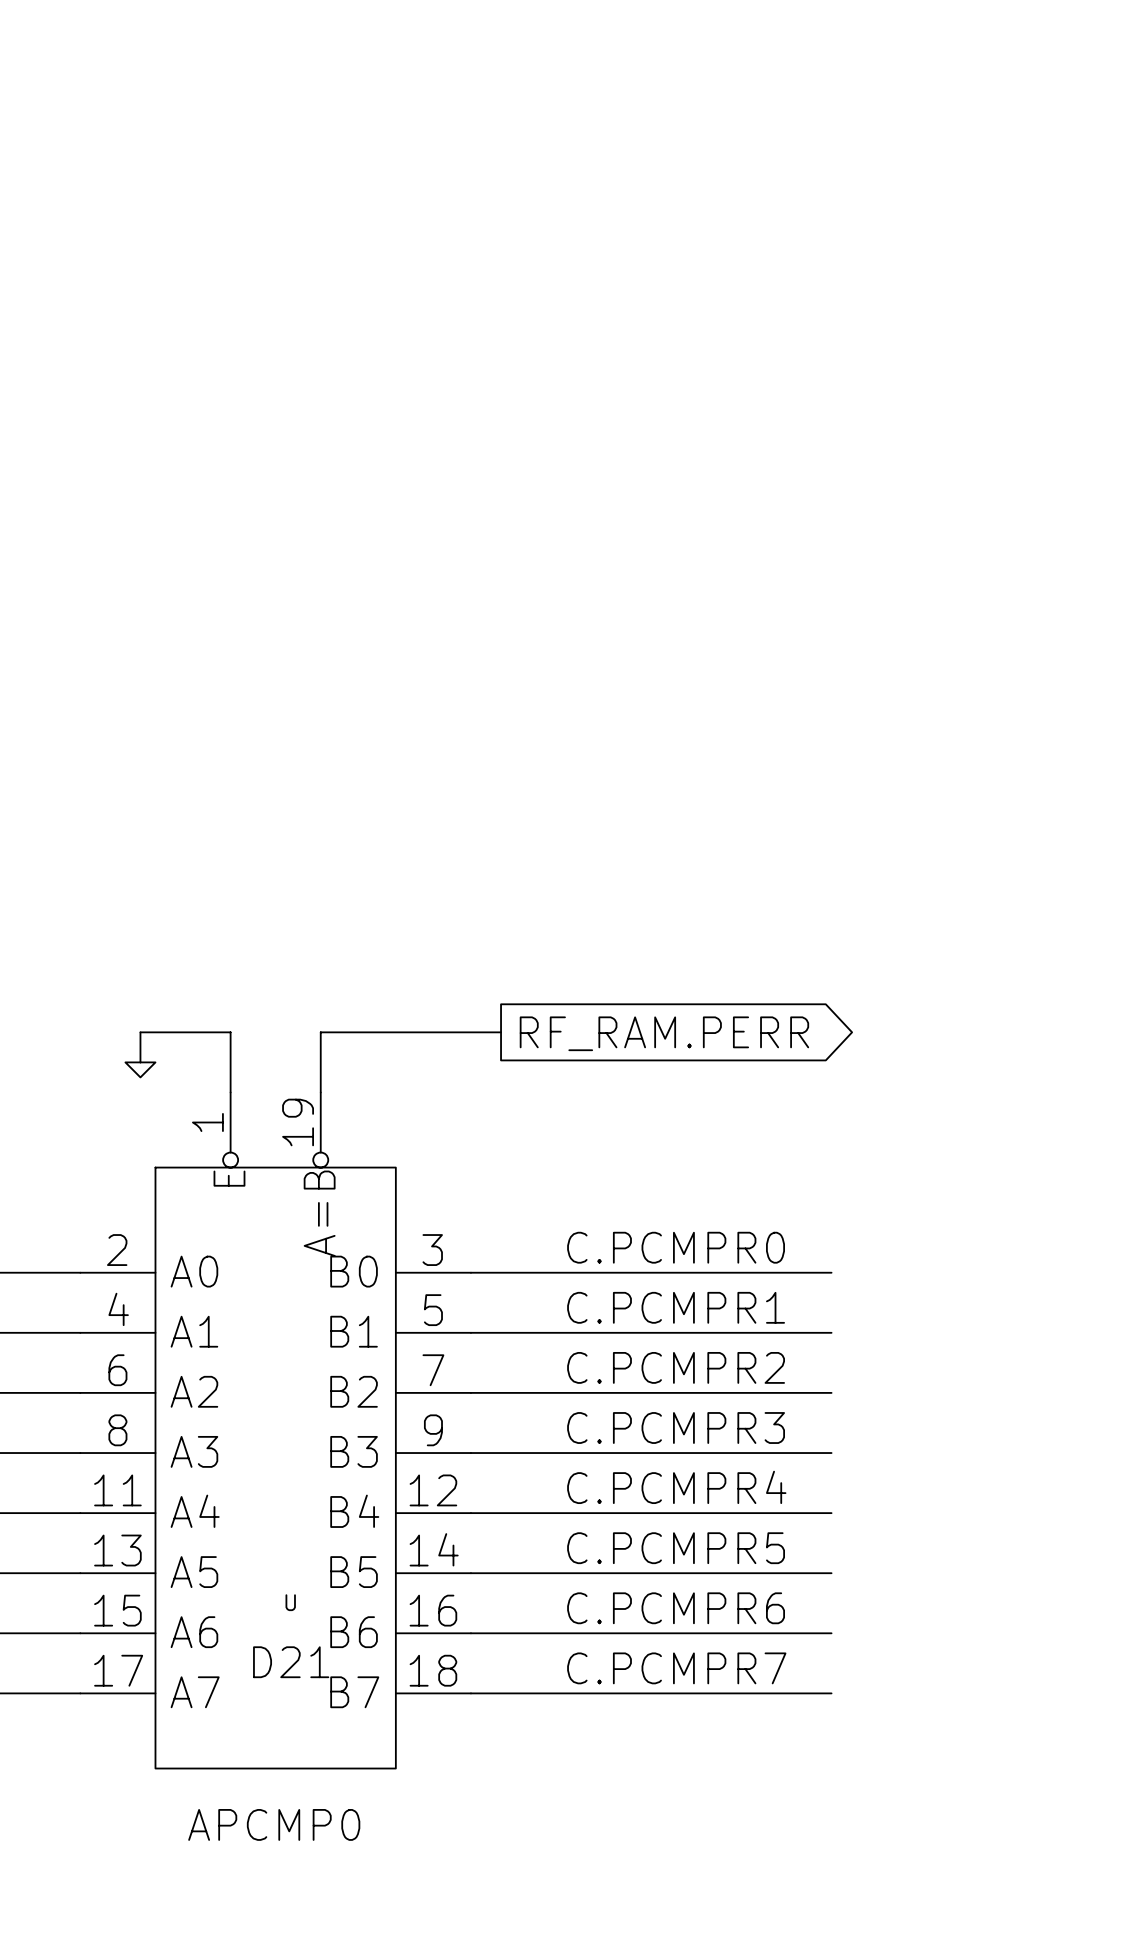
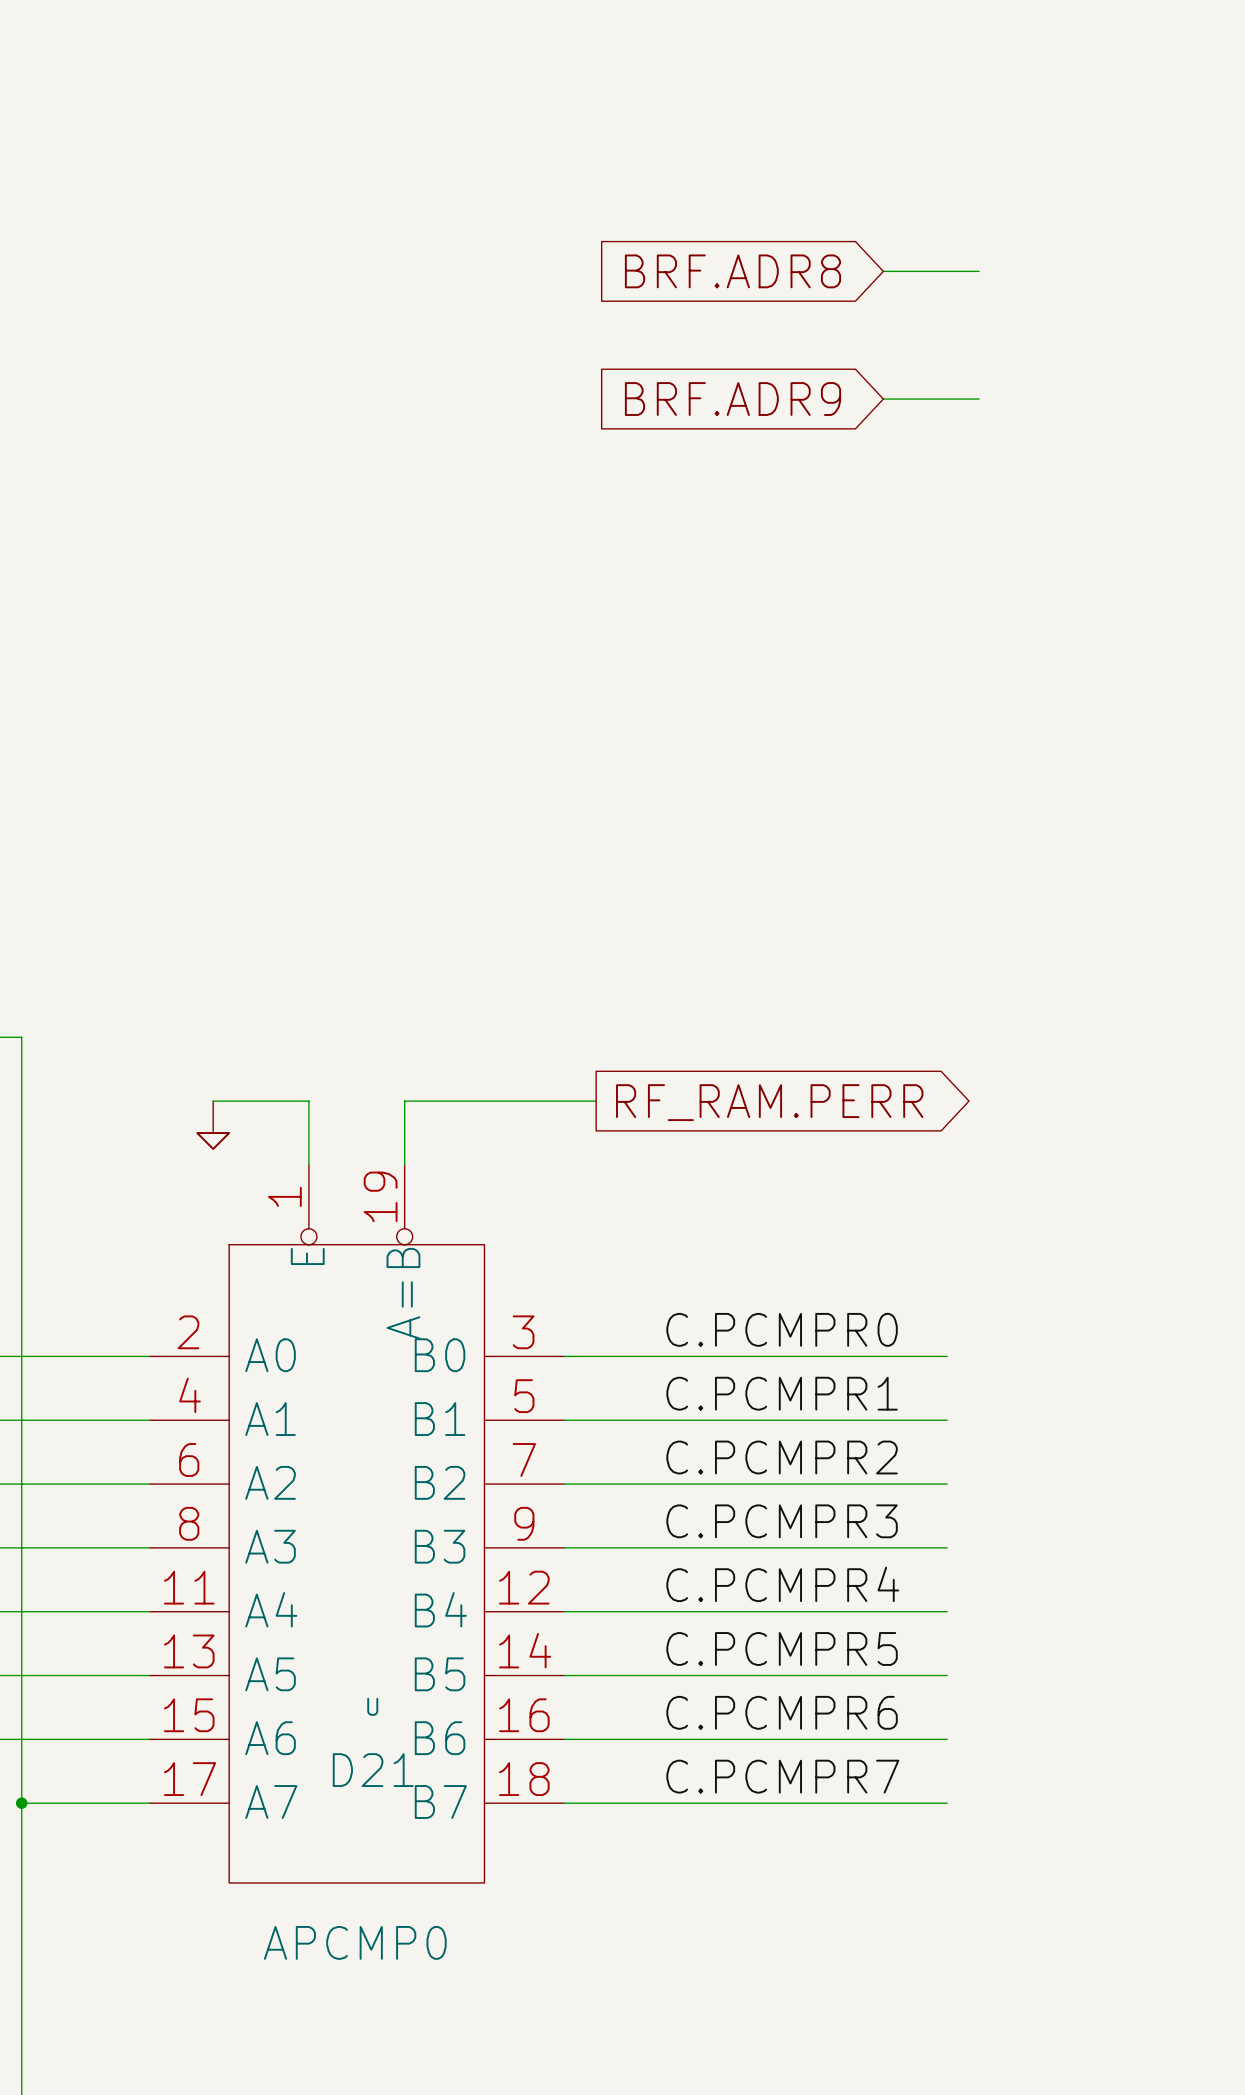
global label: none -> BRF.ADR8 (732, 271)
wire: none -> (883, 271) (979, 271)
global label: none -> BRF.ADR9 (732, 399)
wire: none -> (883, 399) (979, 399)

